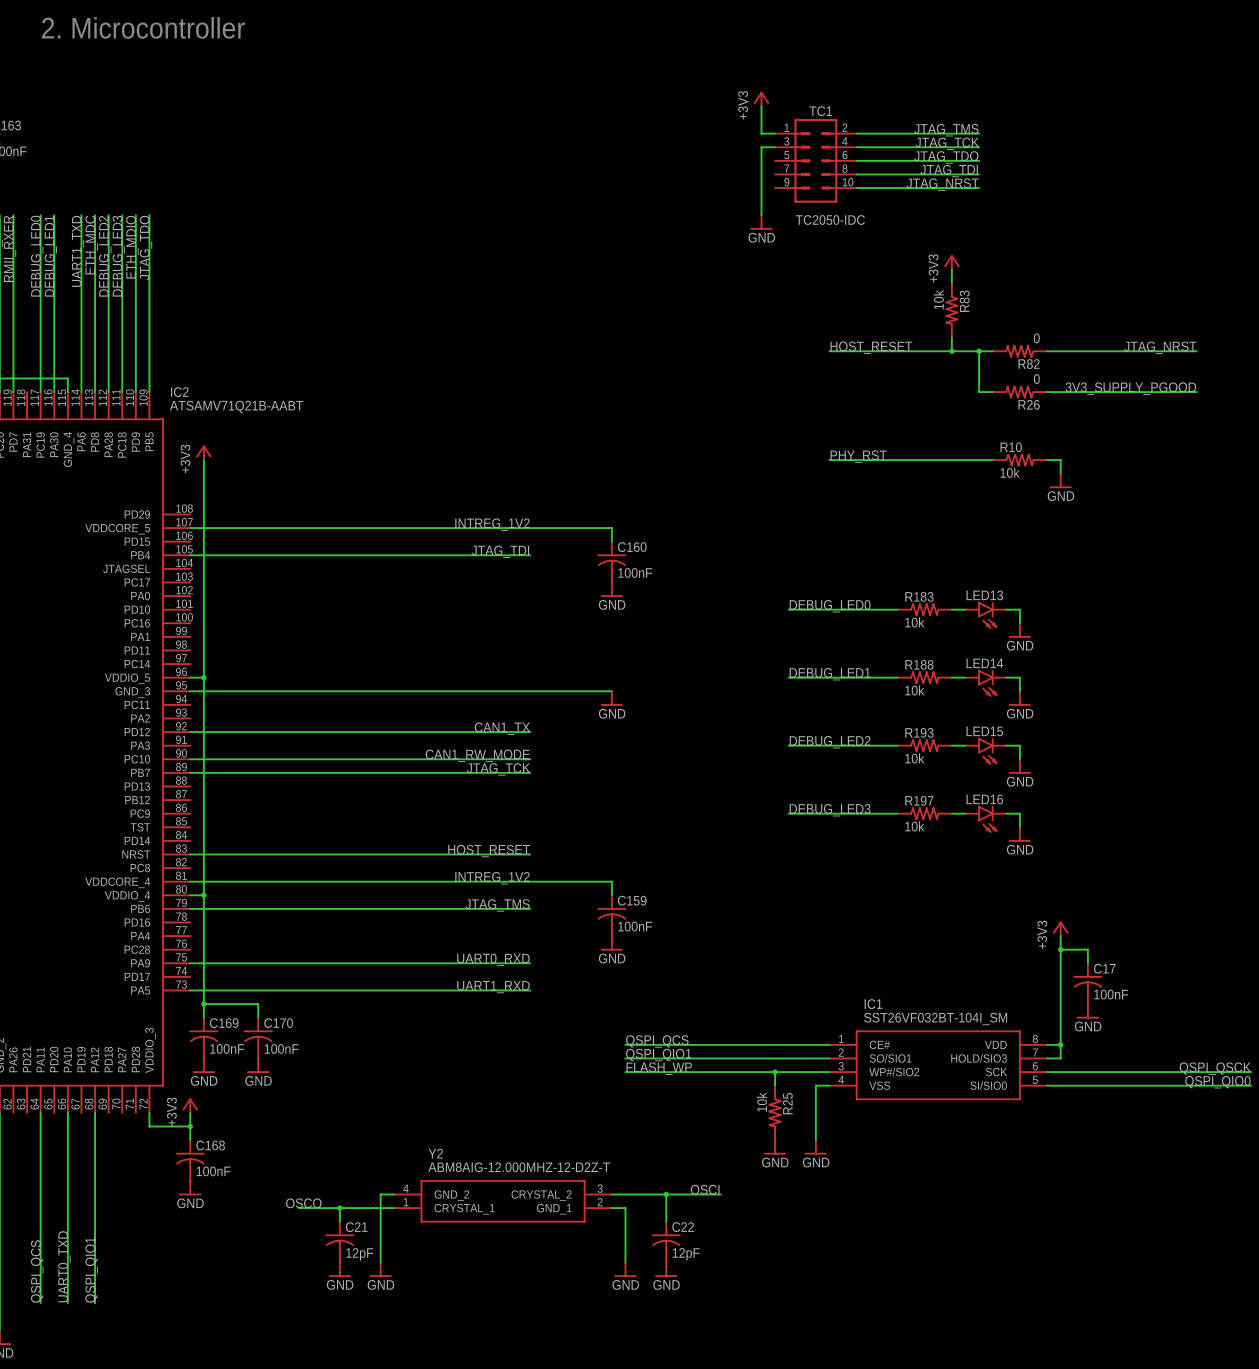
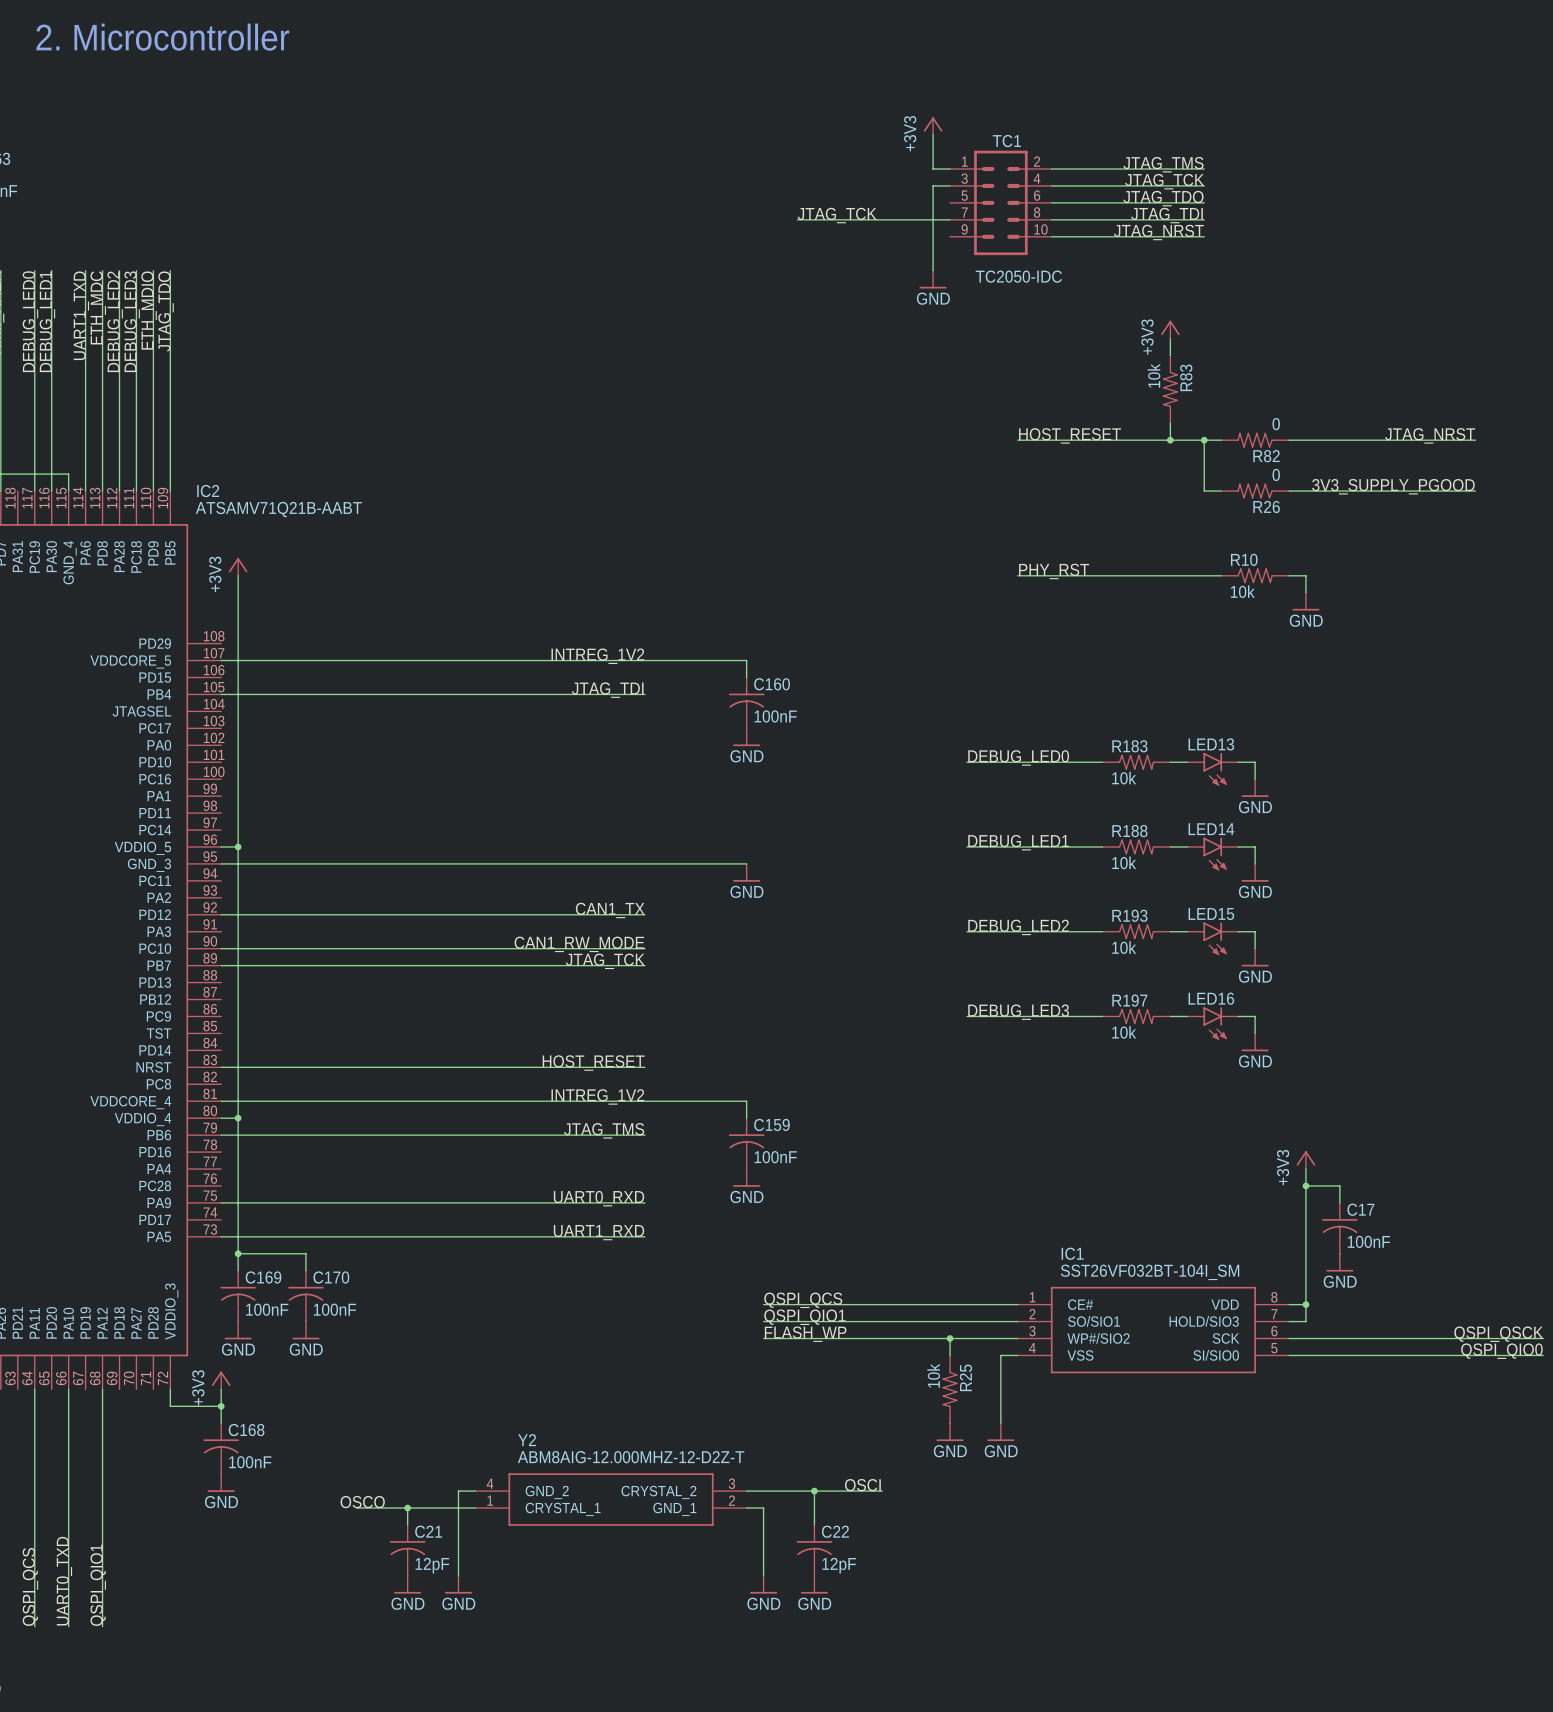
label: none -> JTAG_TCK (837, 215)
wire: none -> (797, 219) (950, 219)

